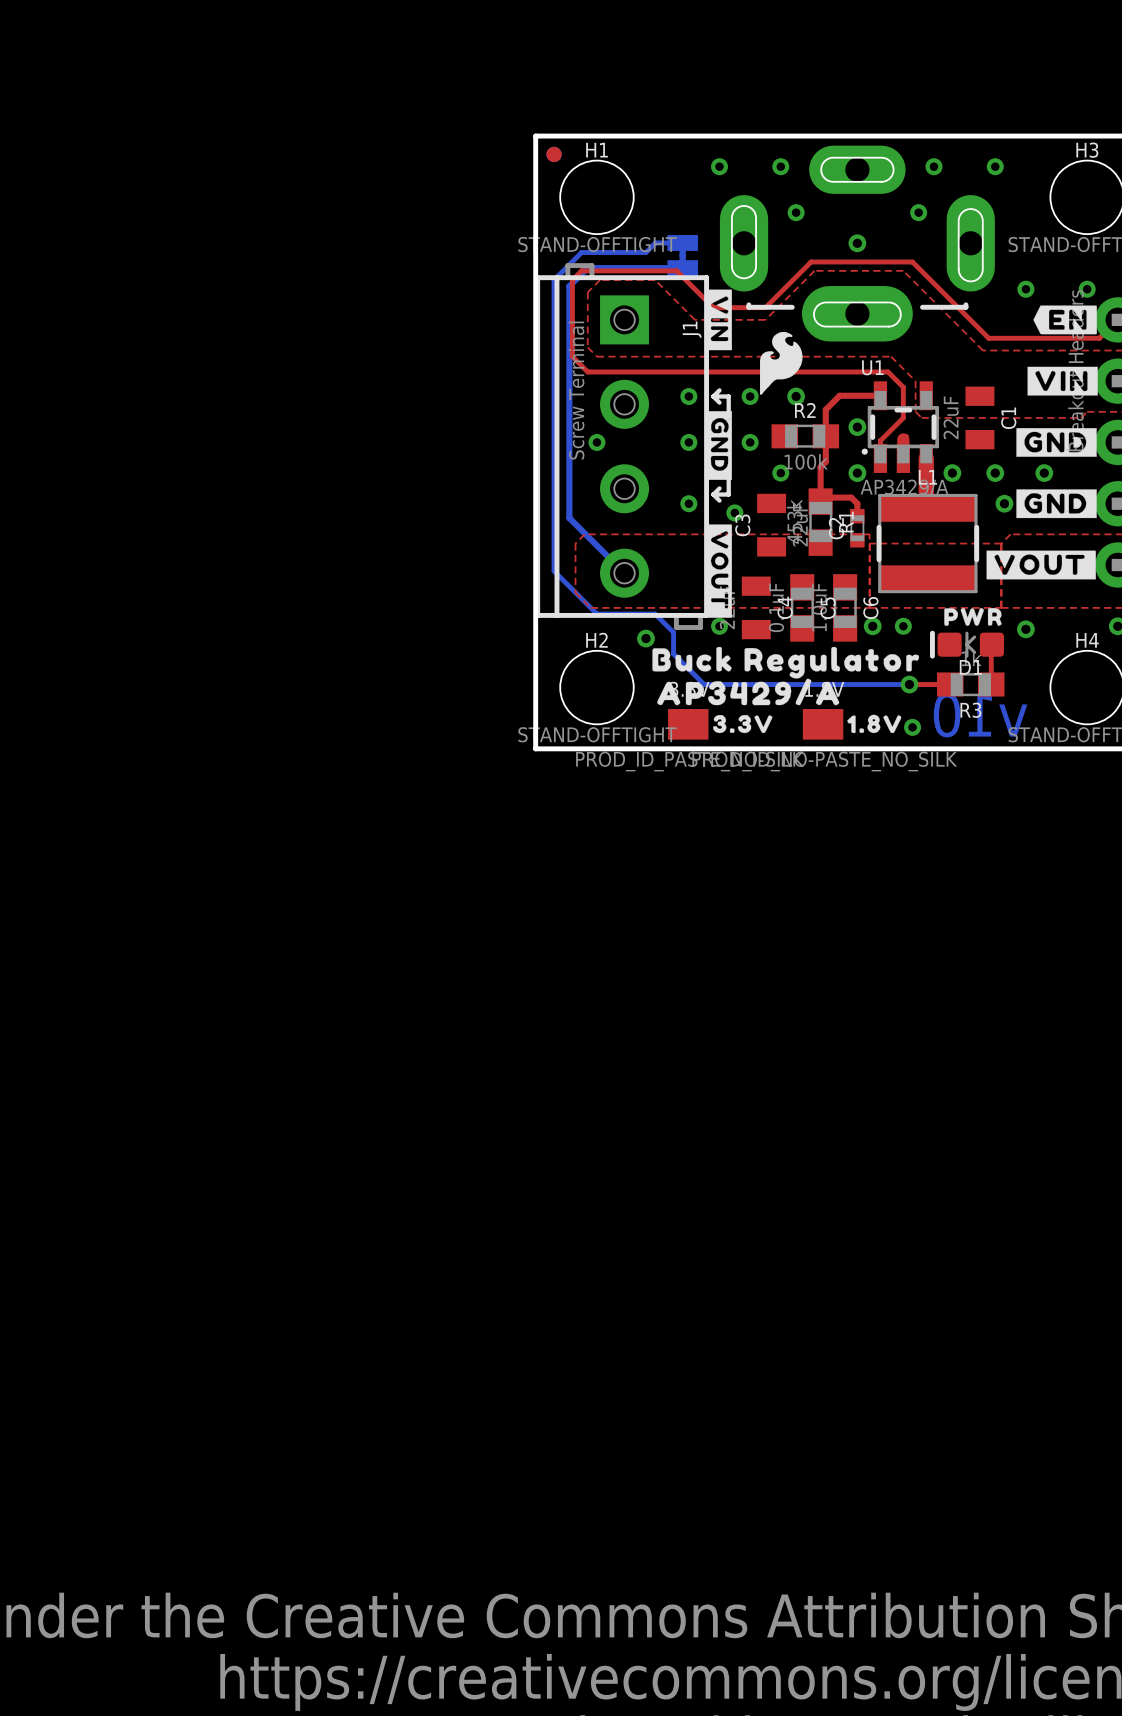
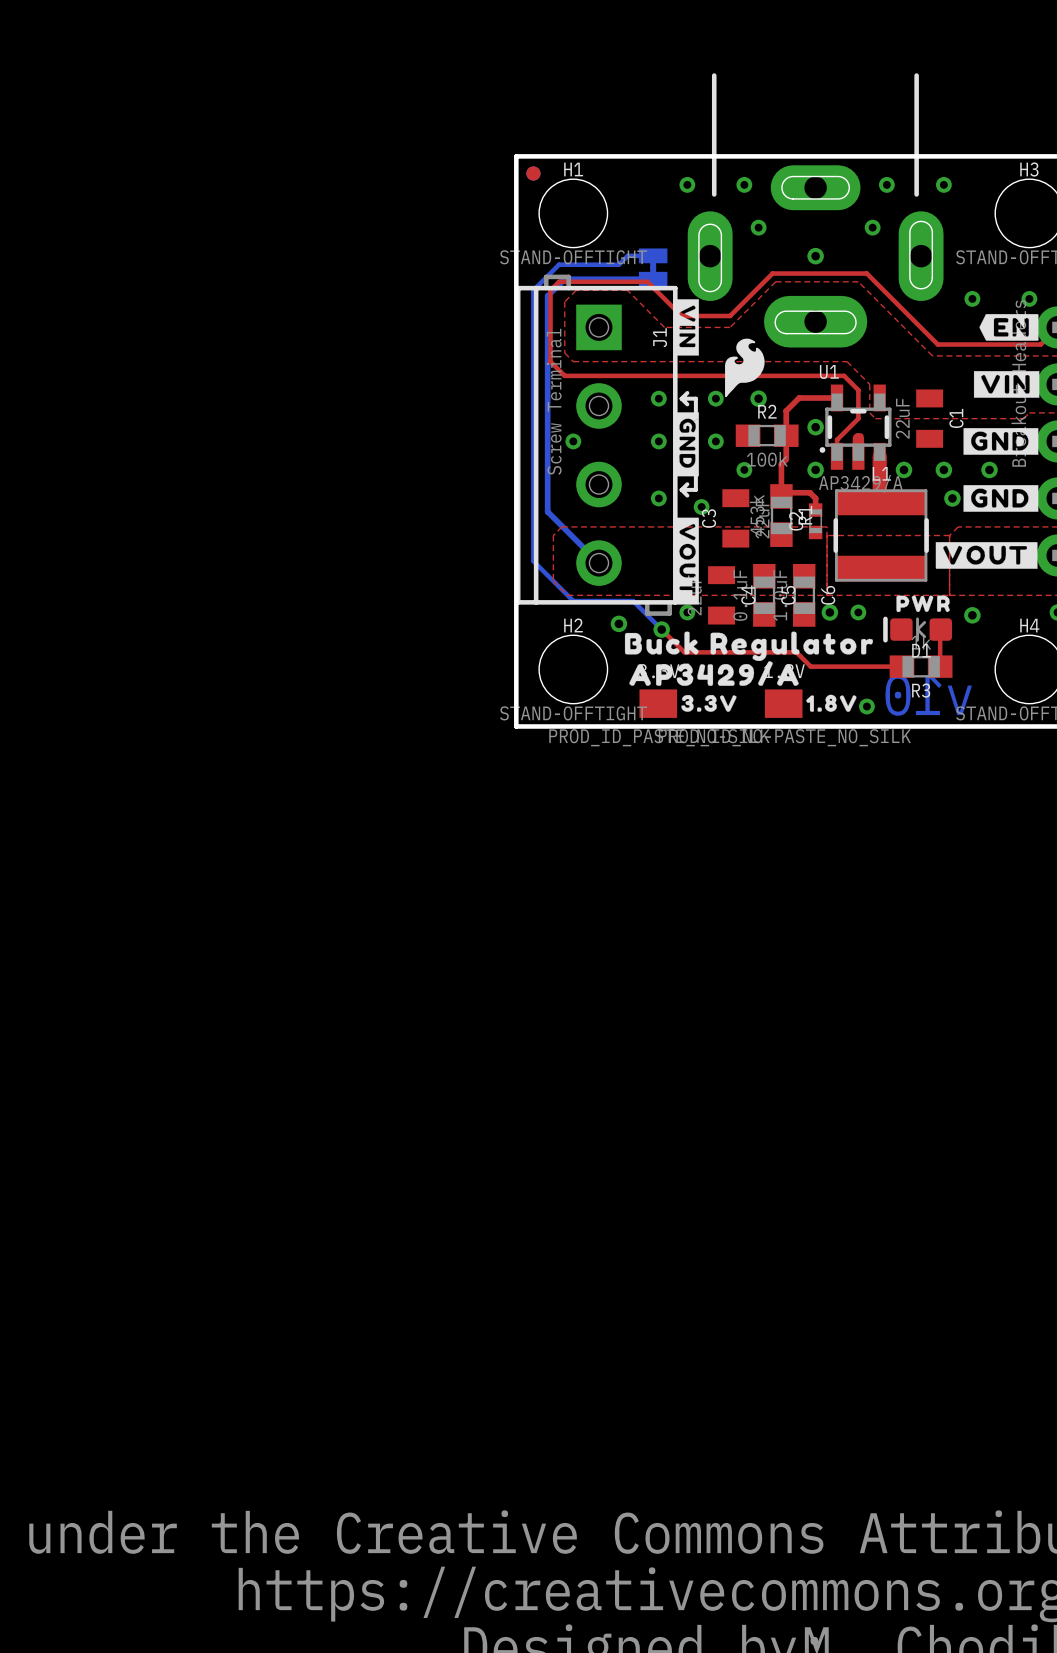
part side: top (857, 243) -> bottom (815, 210)
bottom track: (655, 614) (673, 632) (673, 653) (704, 684) (909, 684) -> (627, 601) (633, 601) (661, 629)
top track: none -> (661, 629) (684, 652) (796, 652) (810, 666) (864, 666)
via: none -> (661, 629)
via: (909, 684) -> none

